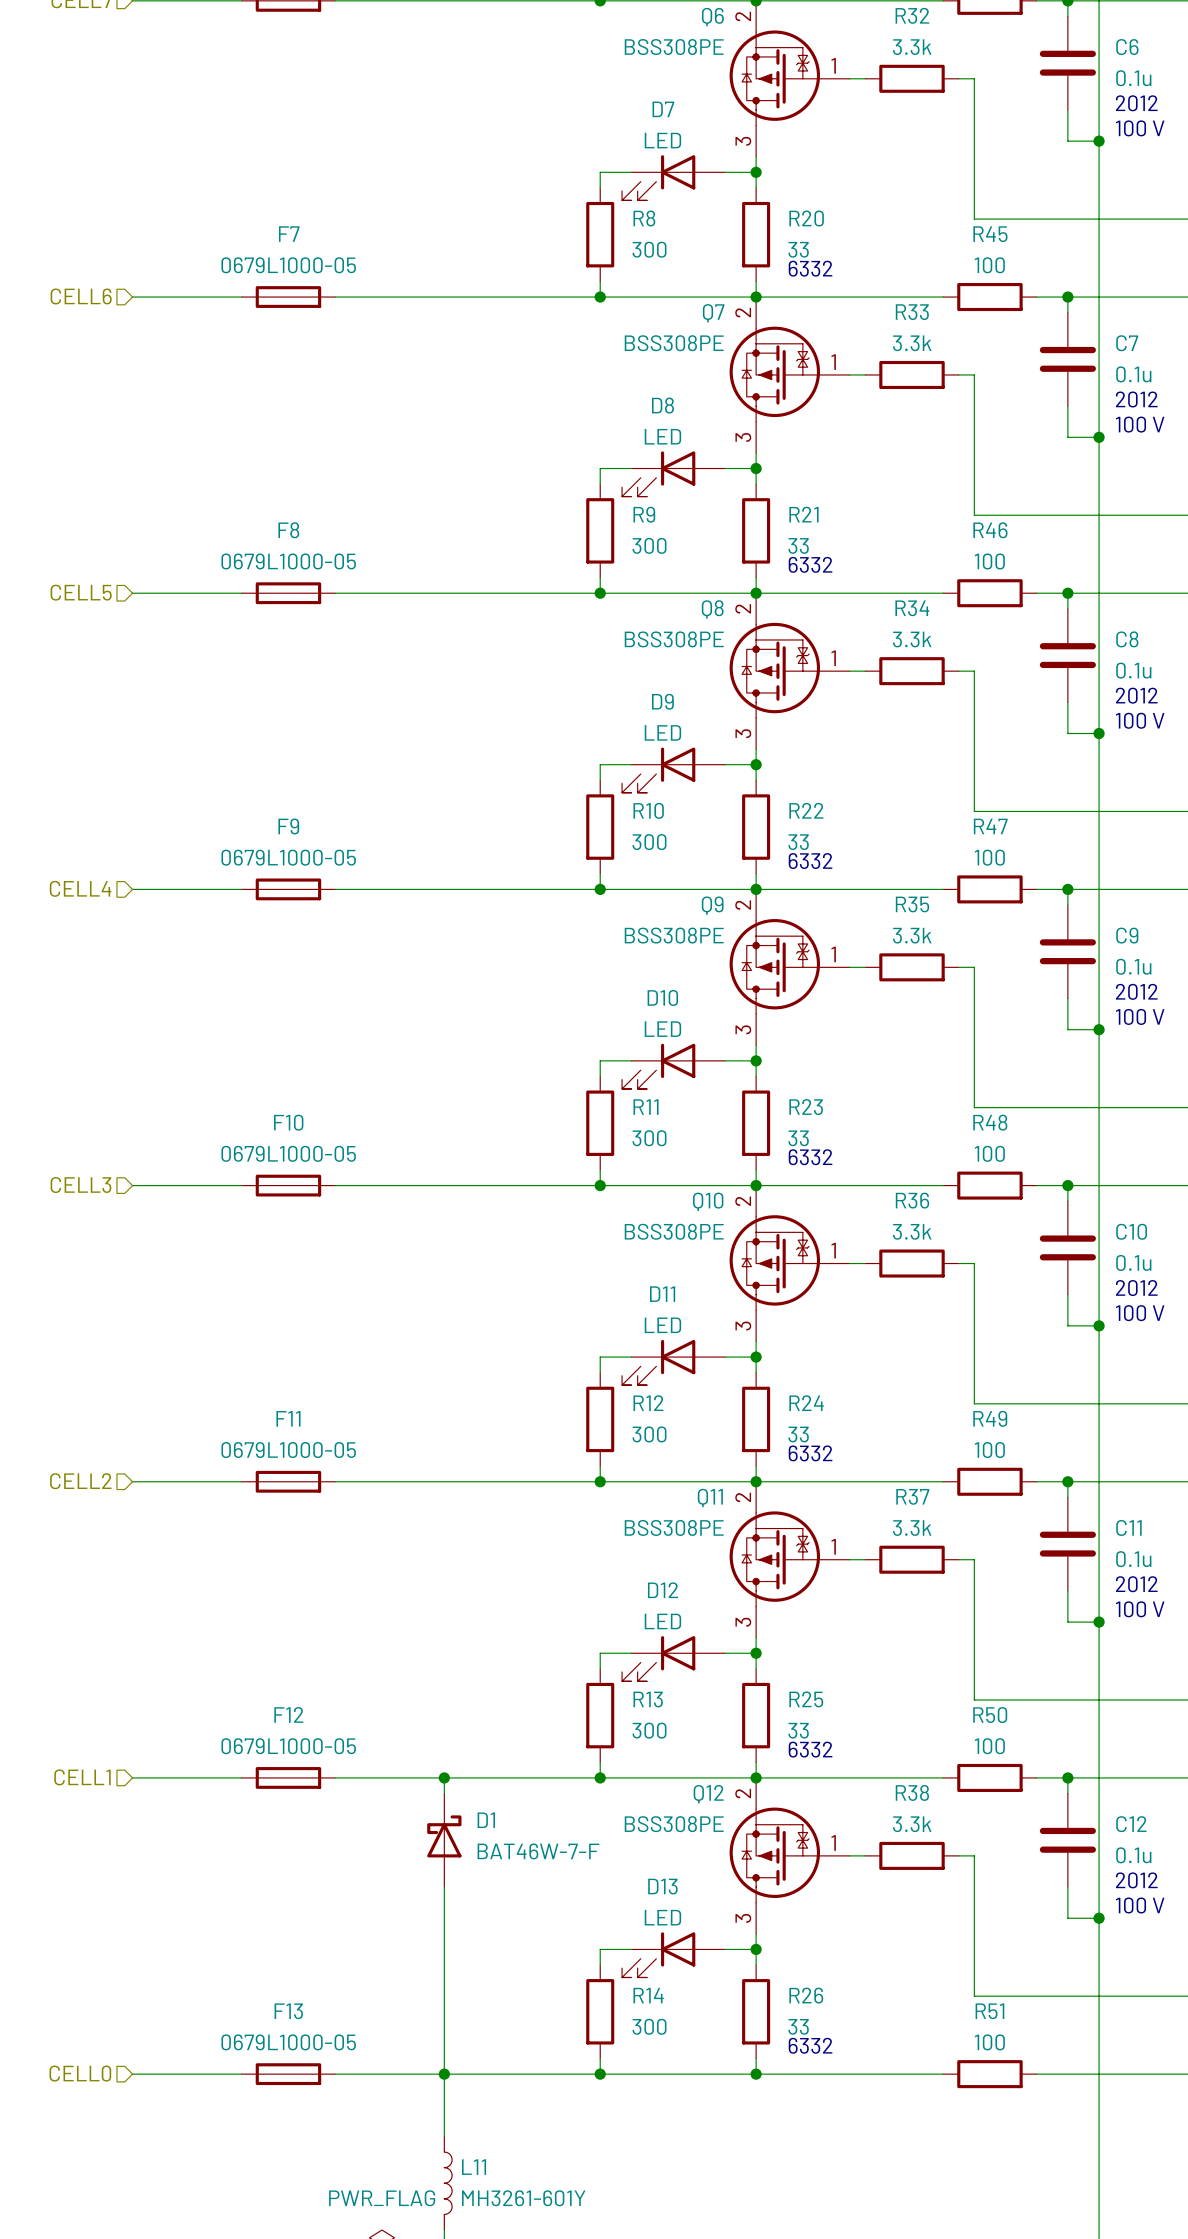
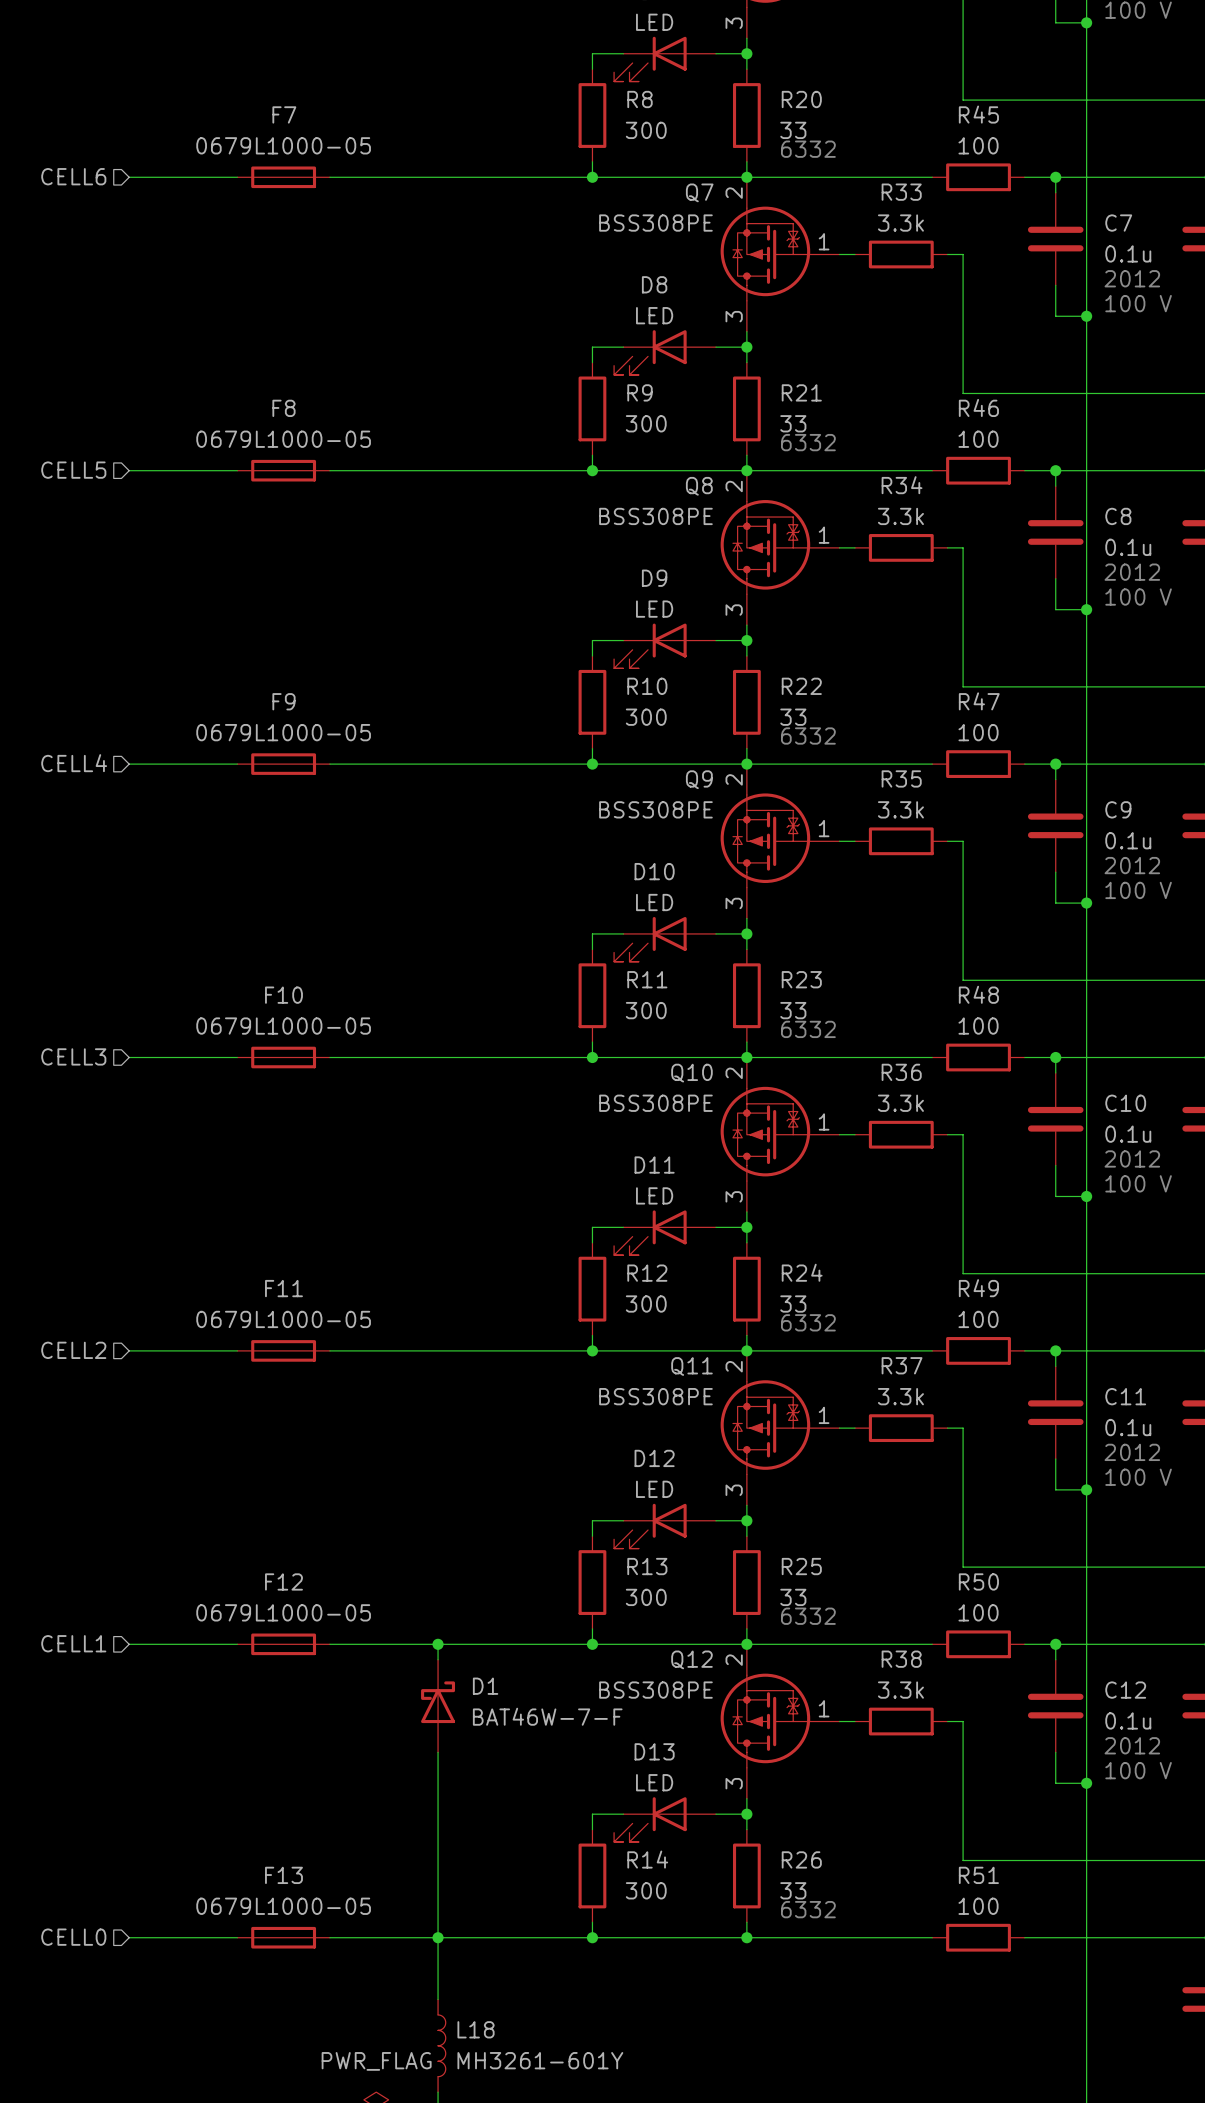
L11 name: L11 (474, 2167) -> L18 (476, 2029)

